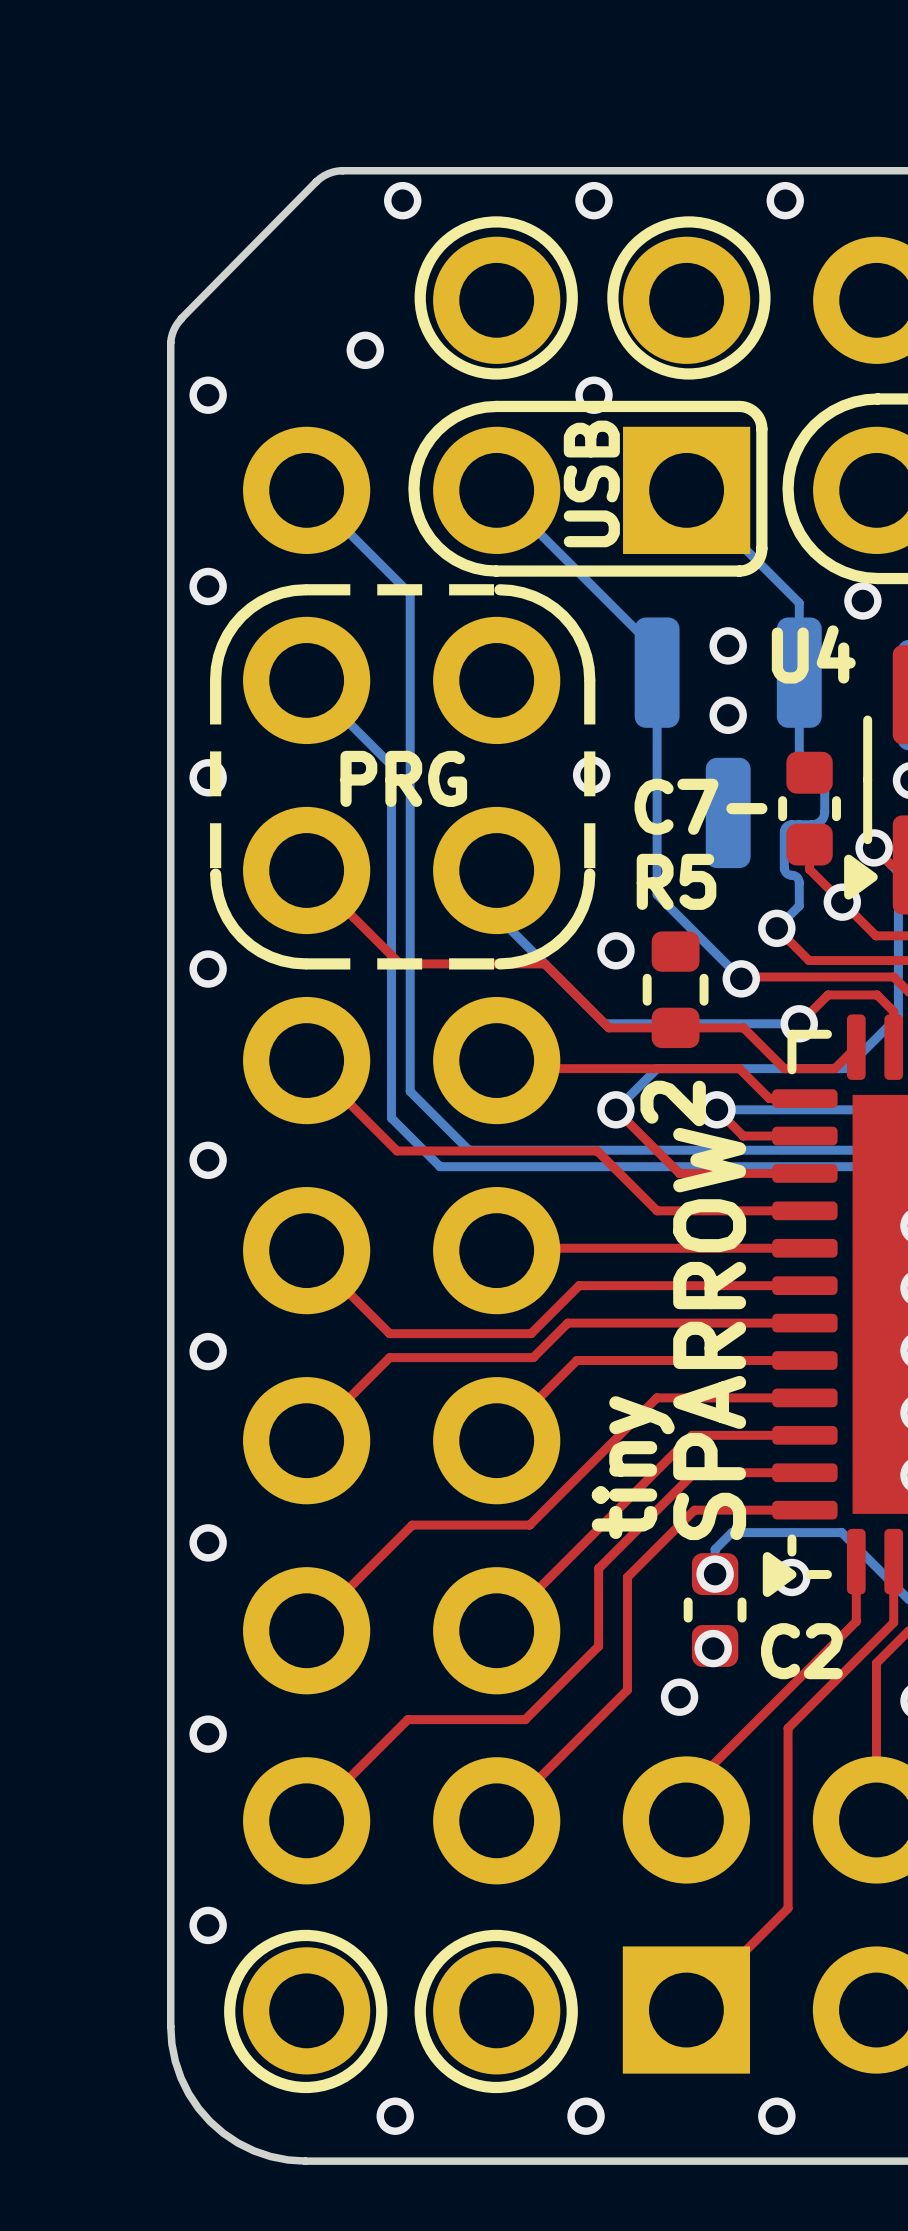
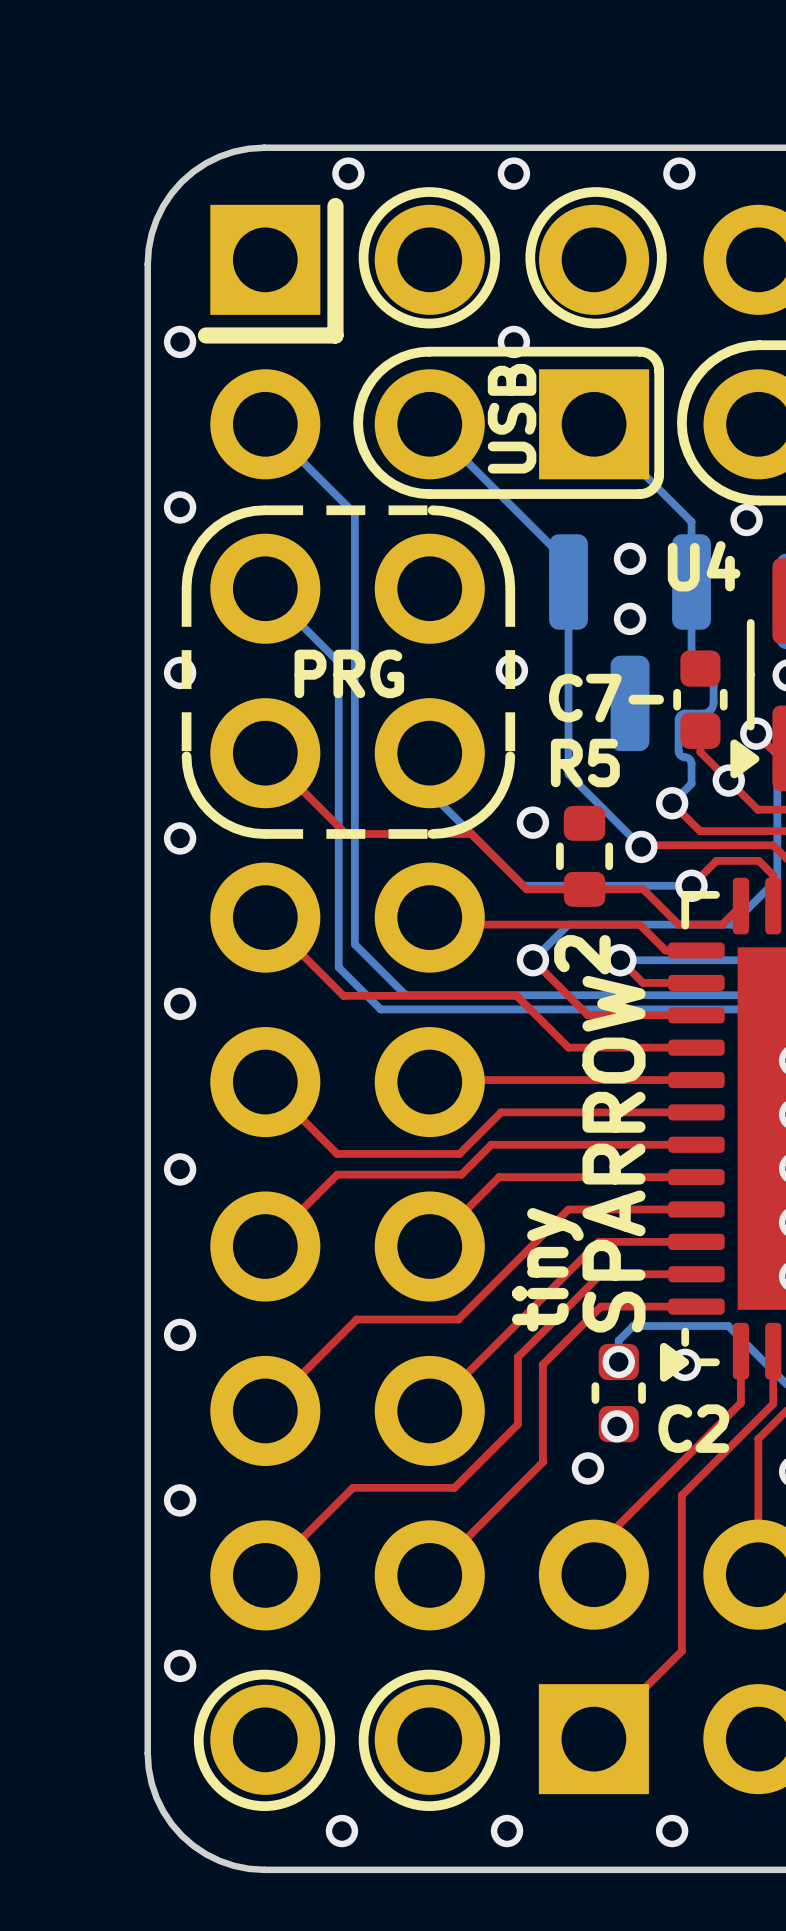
board edge: (342, 170) (328, 173) (316, 181) (181, 318) (173, 329) (170, 342) -> (296, 147) (264, 147) (234, 151) (205, 163) (181, 181) (163, 205) (151, 234) (147, 264) (147, 296)
part footprint: [243, 236, 561, 2075] -> [210, 204, 485, 1795]
line: none -> (335, 205) (335, 335) (205, 335)
via: (365, 350) -> none

